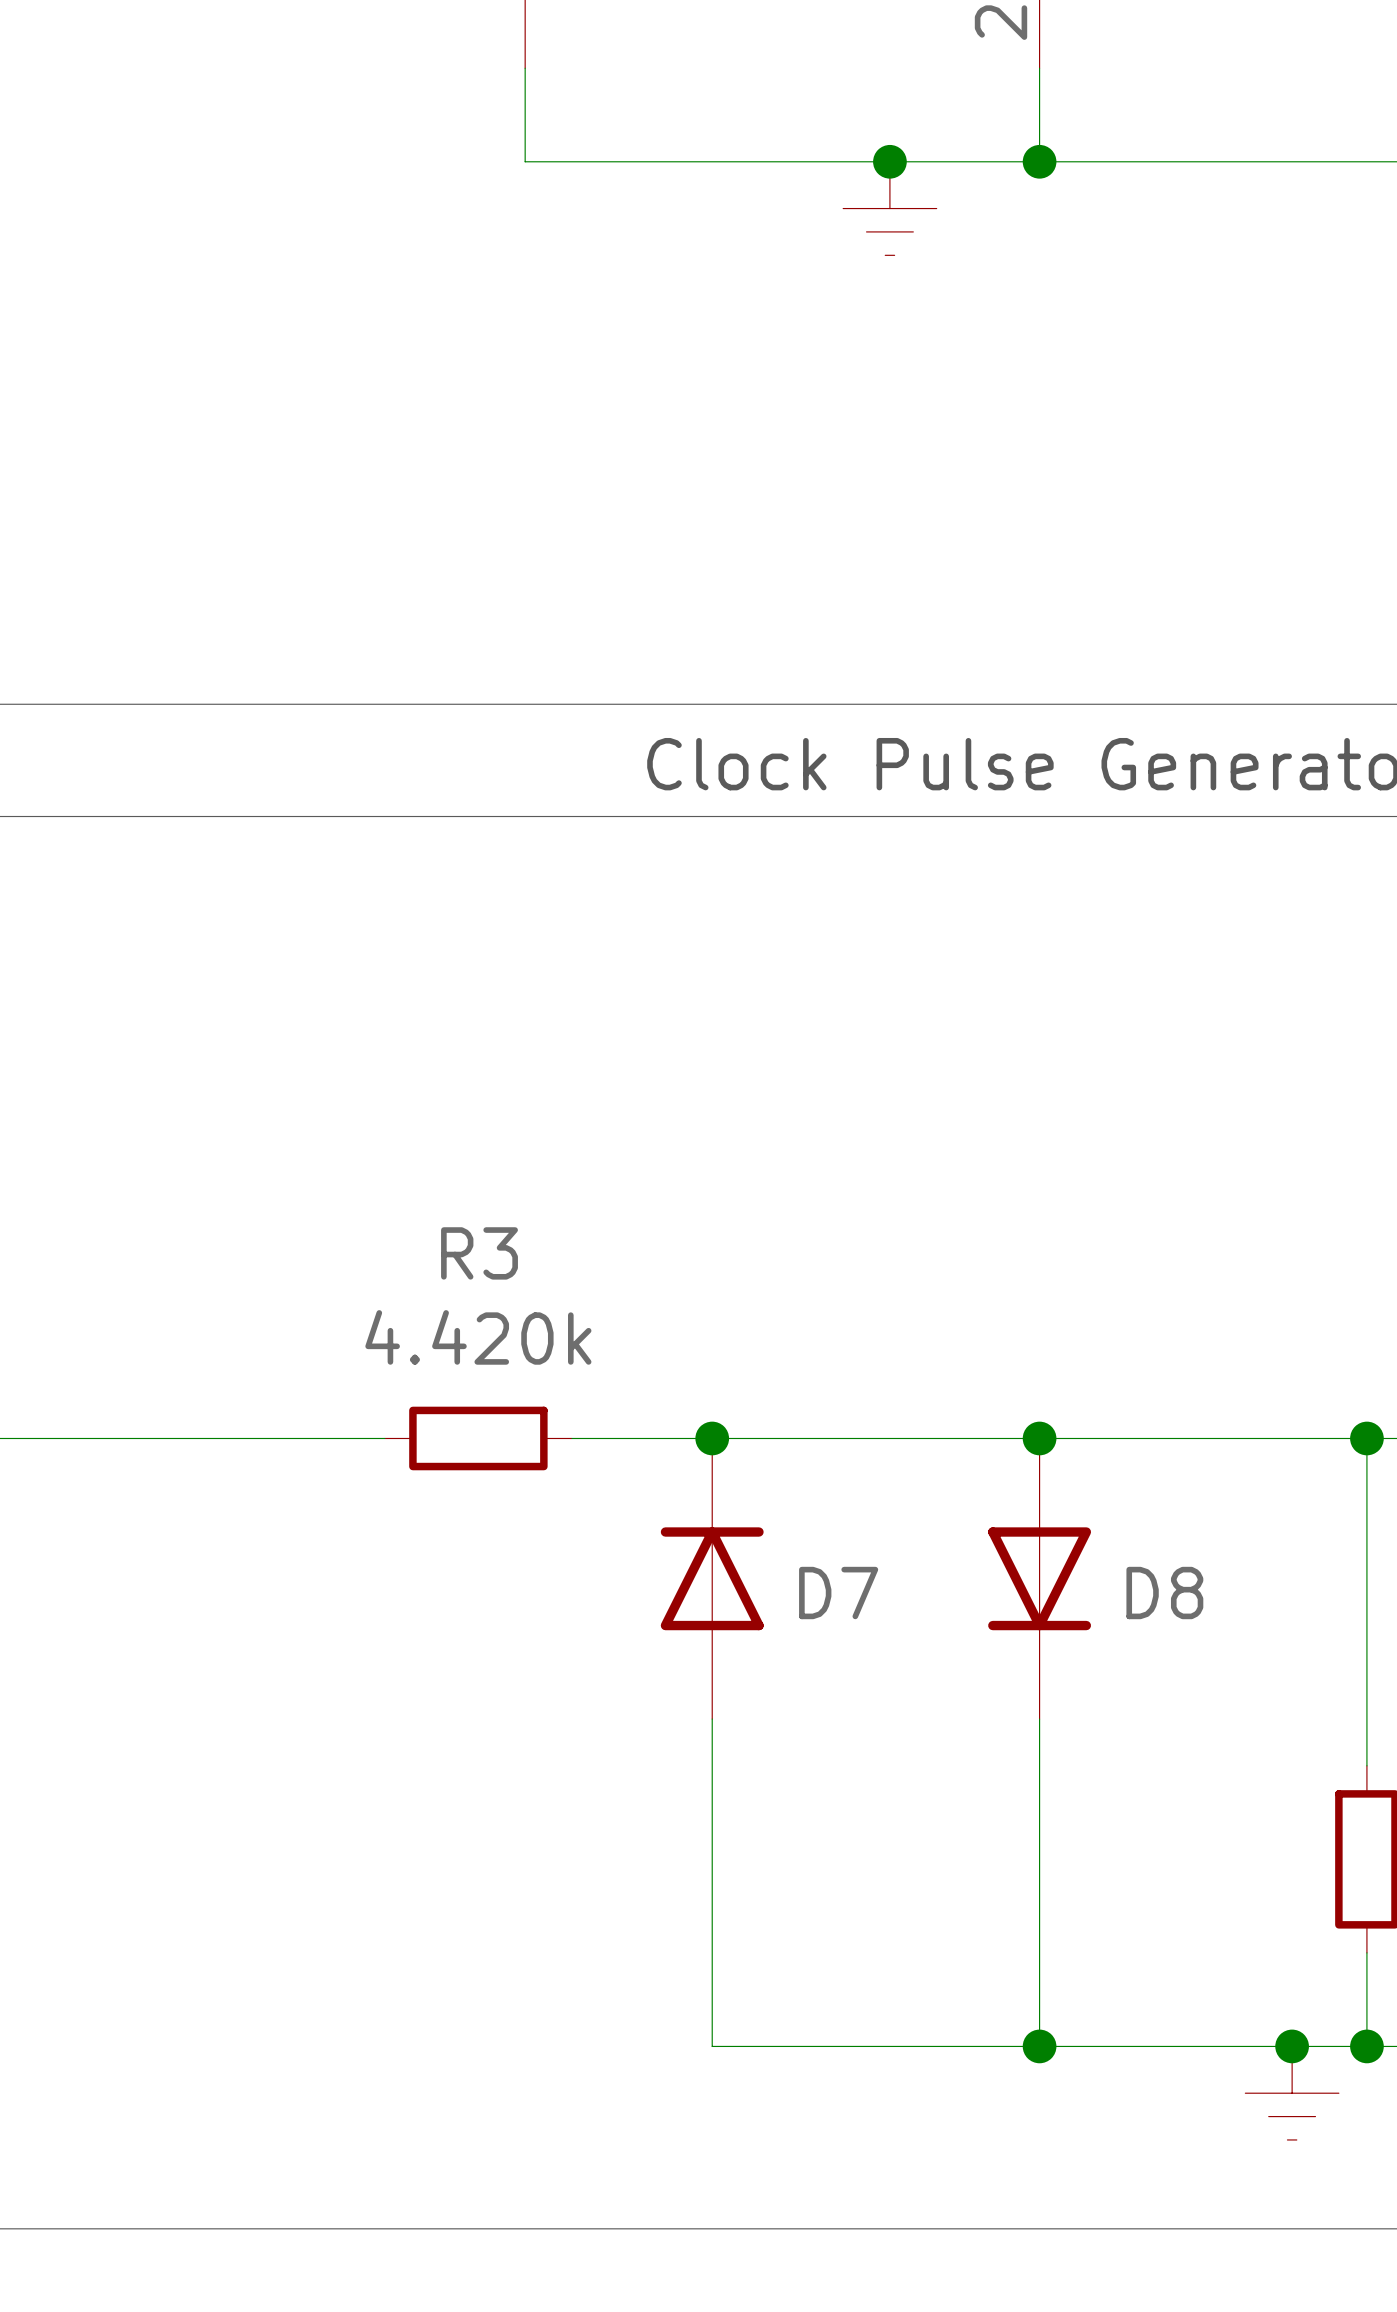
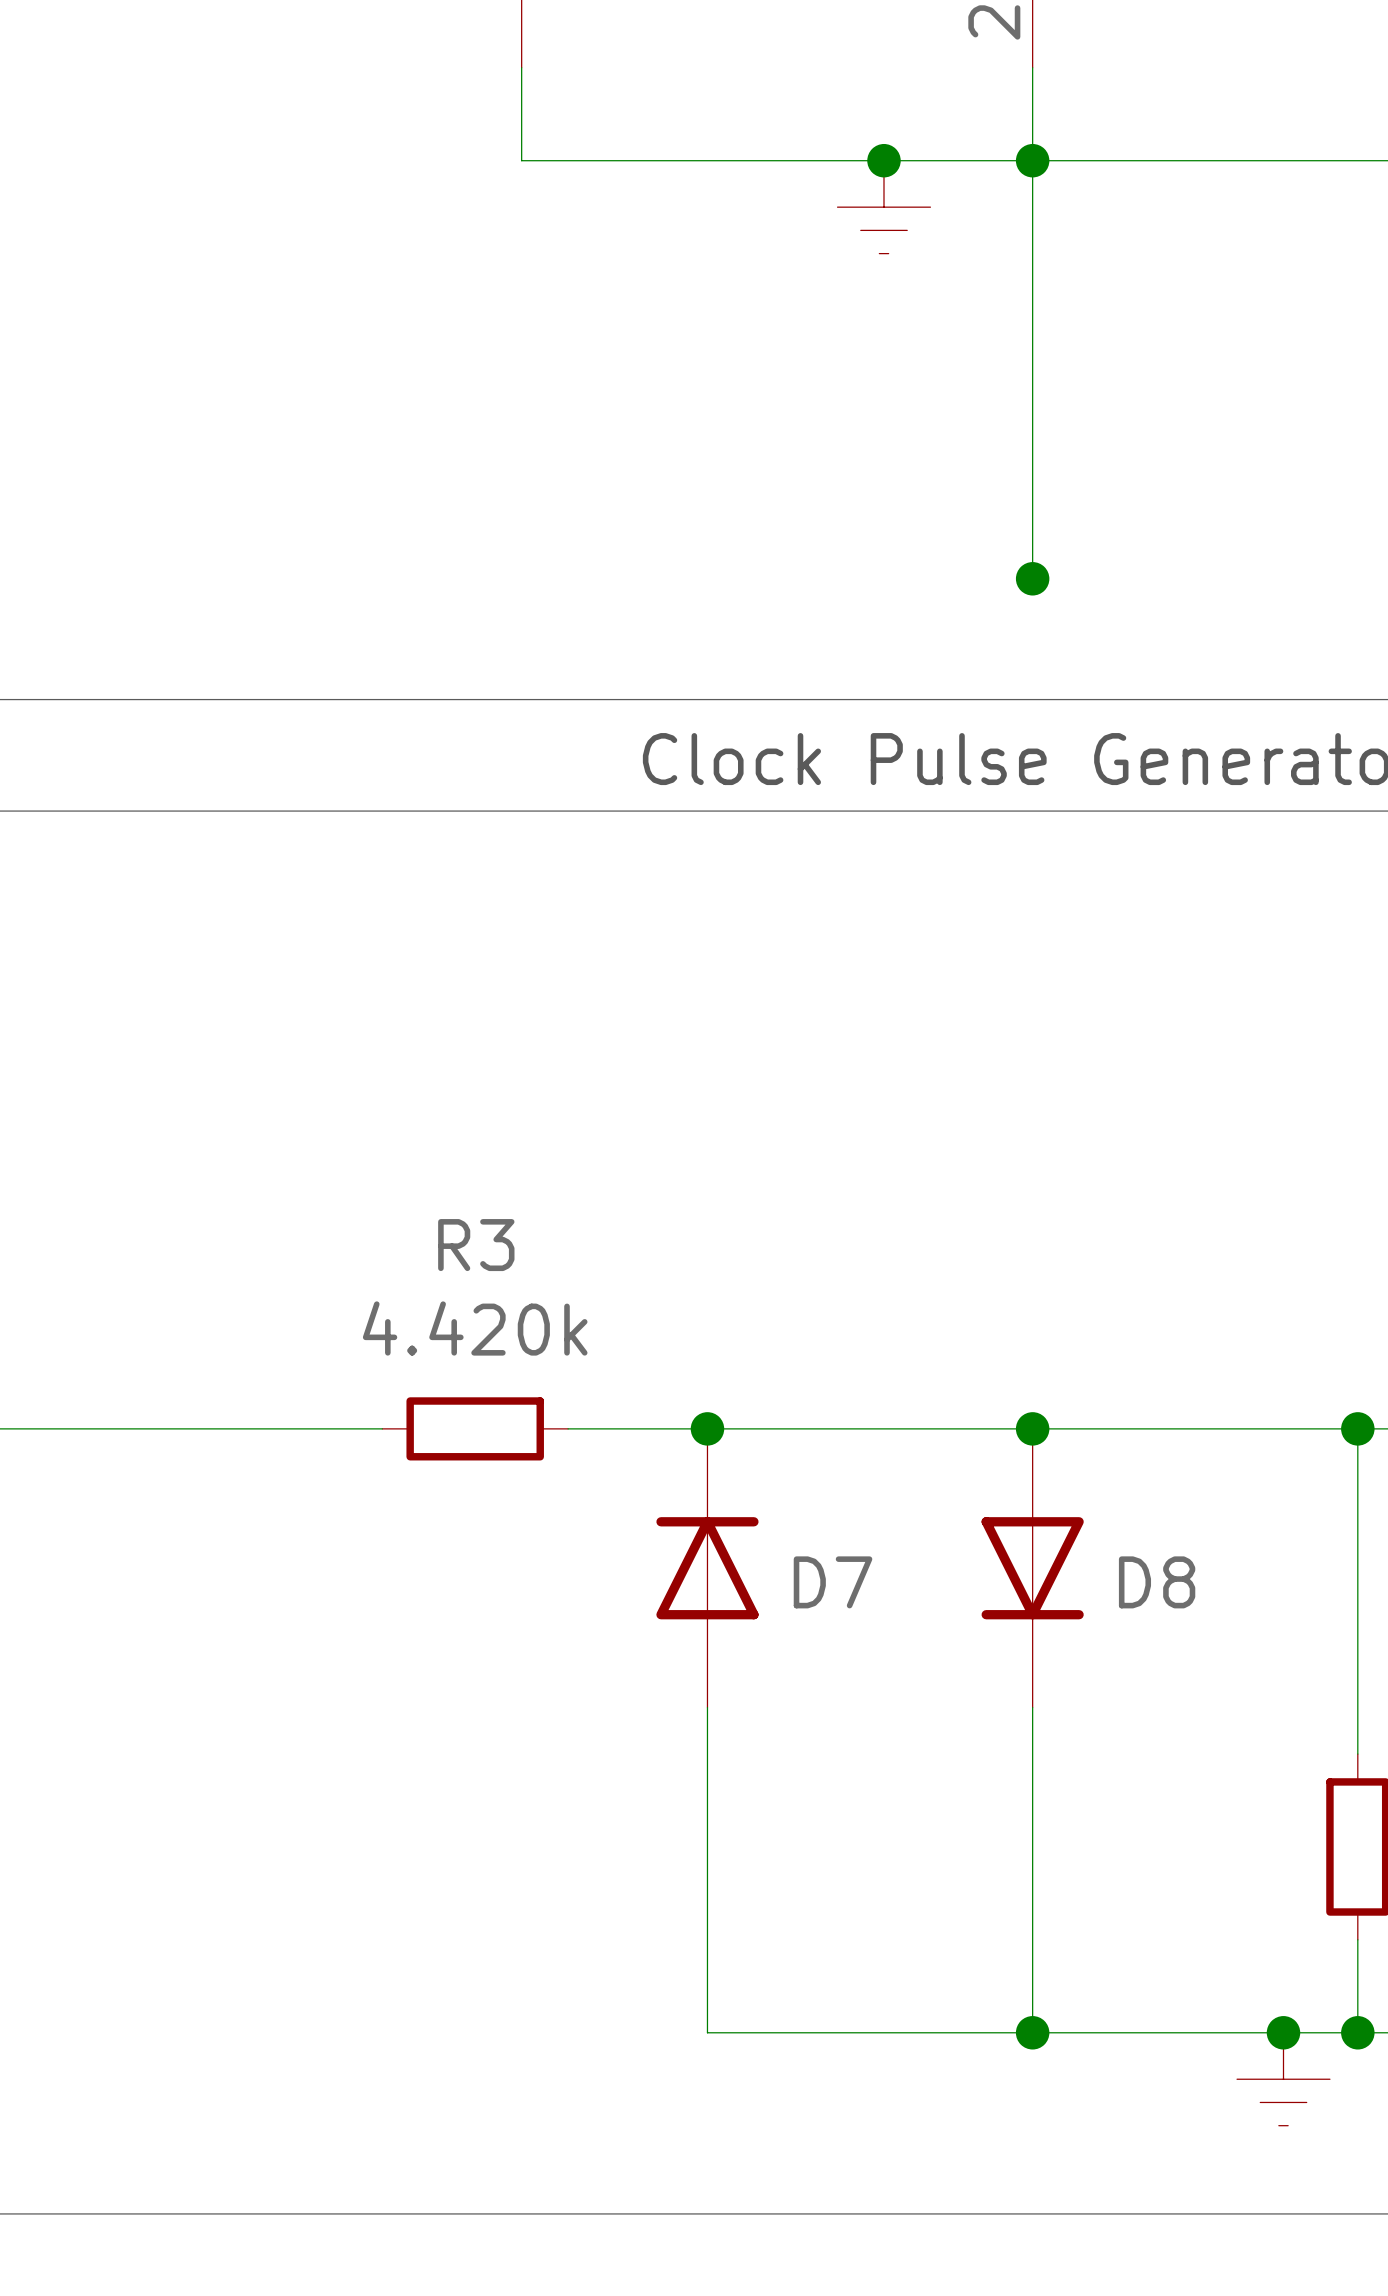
wire: none -> (1032, 160) (1032, 578)
junction: none -> (1032, 578)

